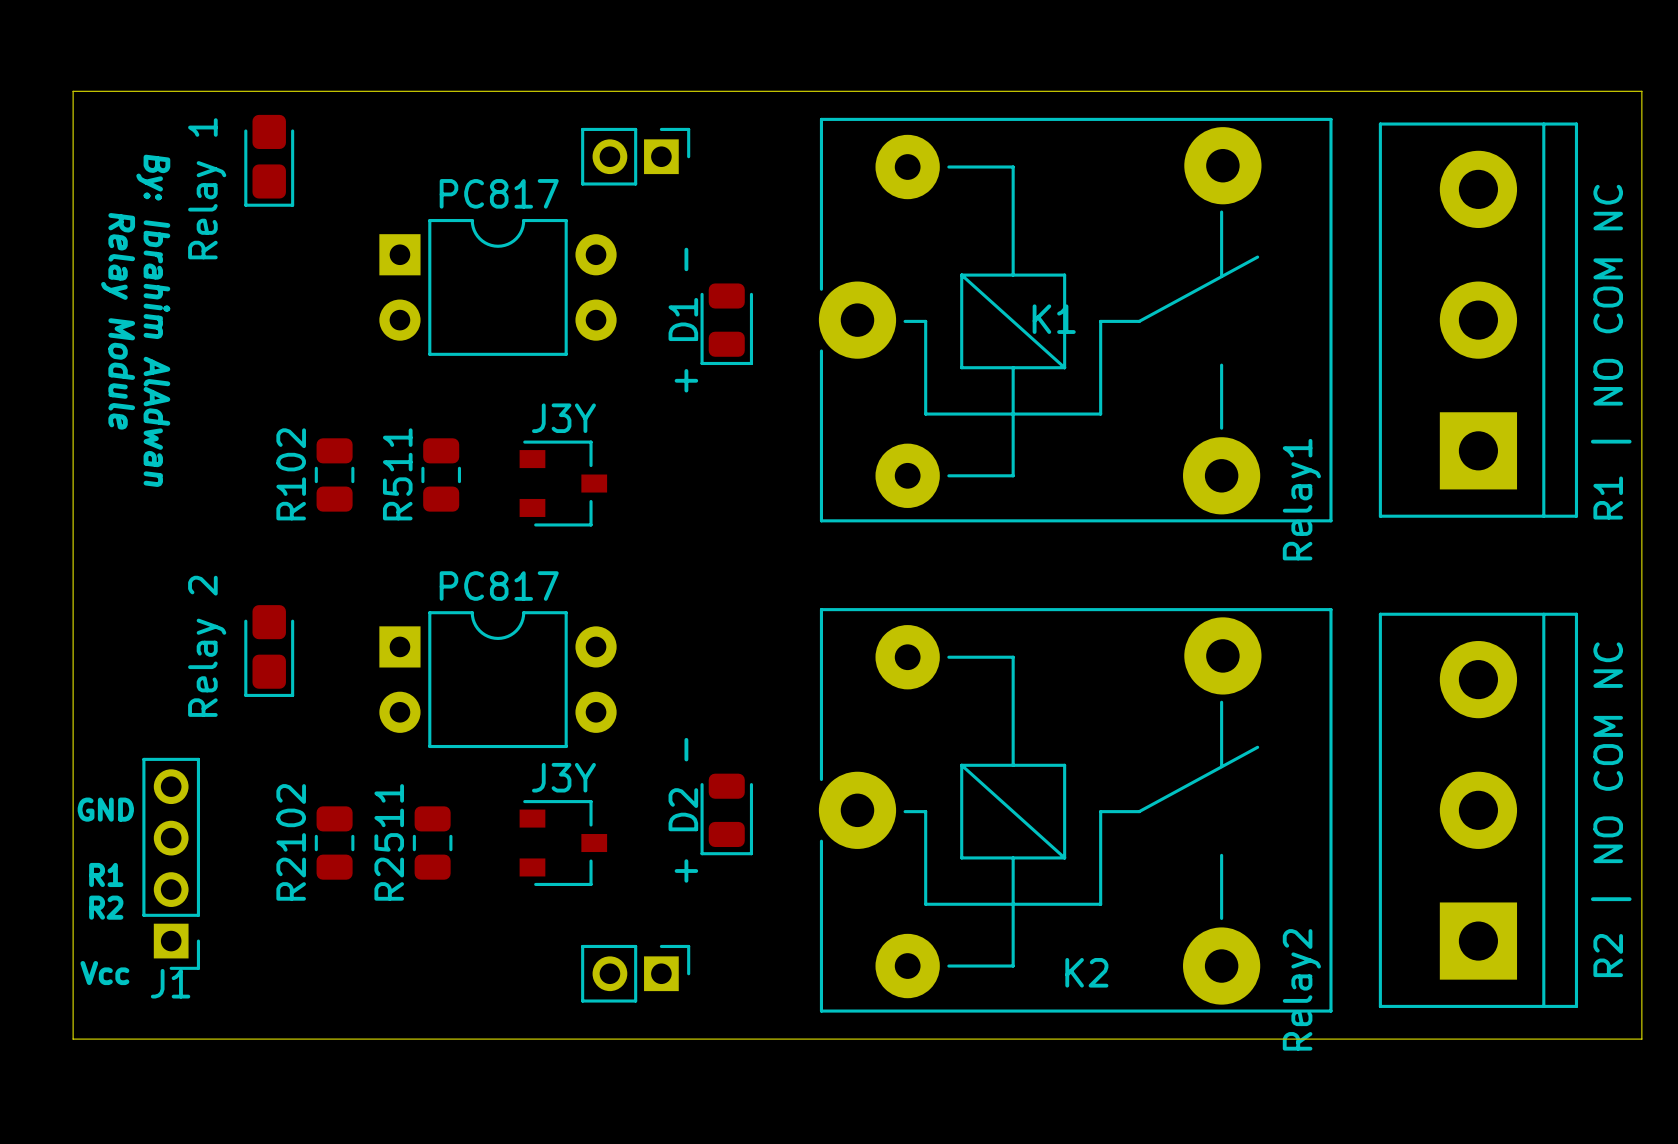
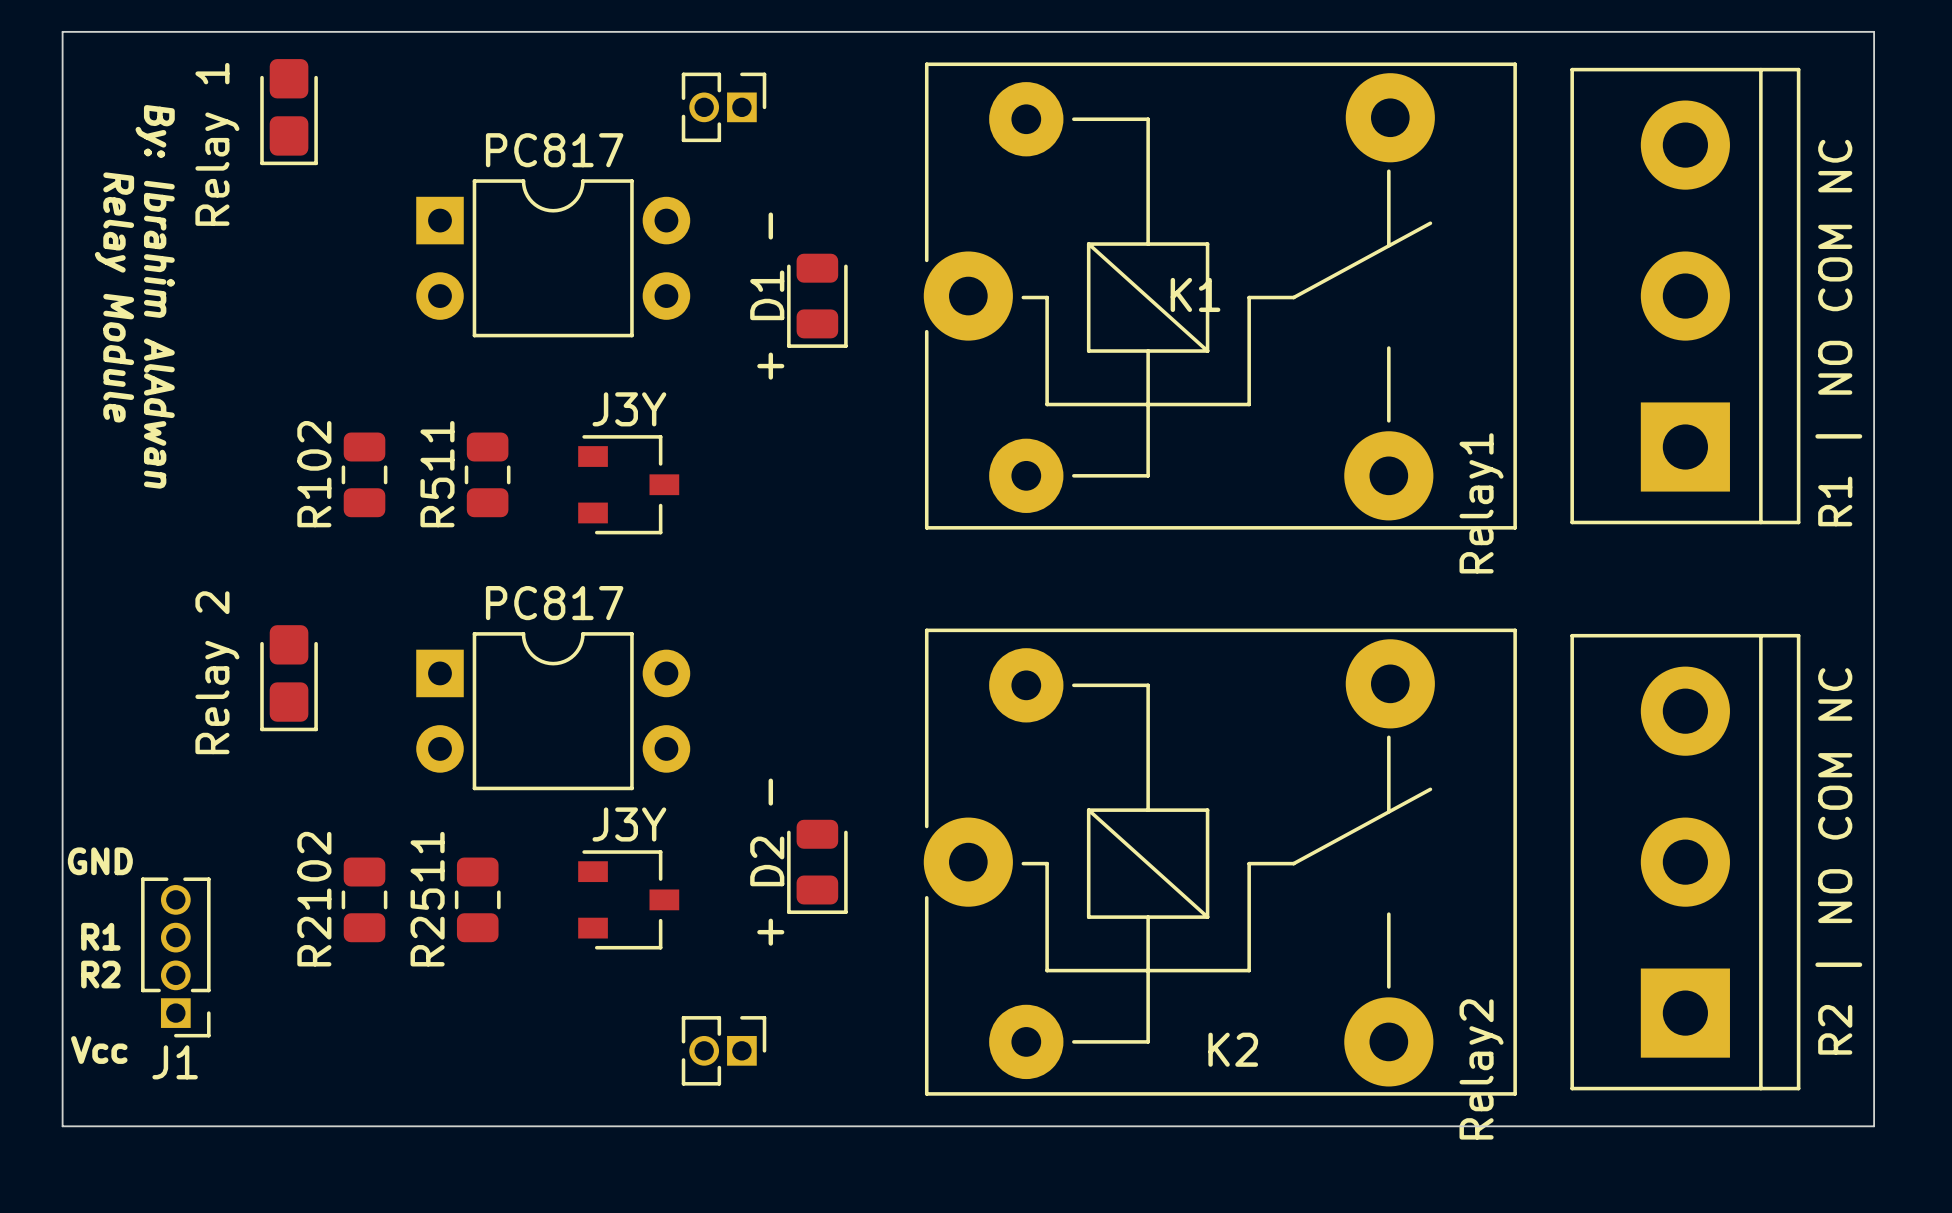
part footprint: [581, 127, 691, 186] -> [681, 72, 767, 143]
J1 footprint: [142, 757, 201, 970] -> [141, 877, 211, 1038]
part footprint: [581, 944, 691, 1003] -> [681, 1016, 767, 1086]

